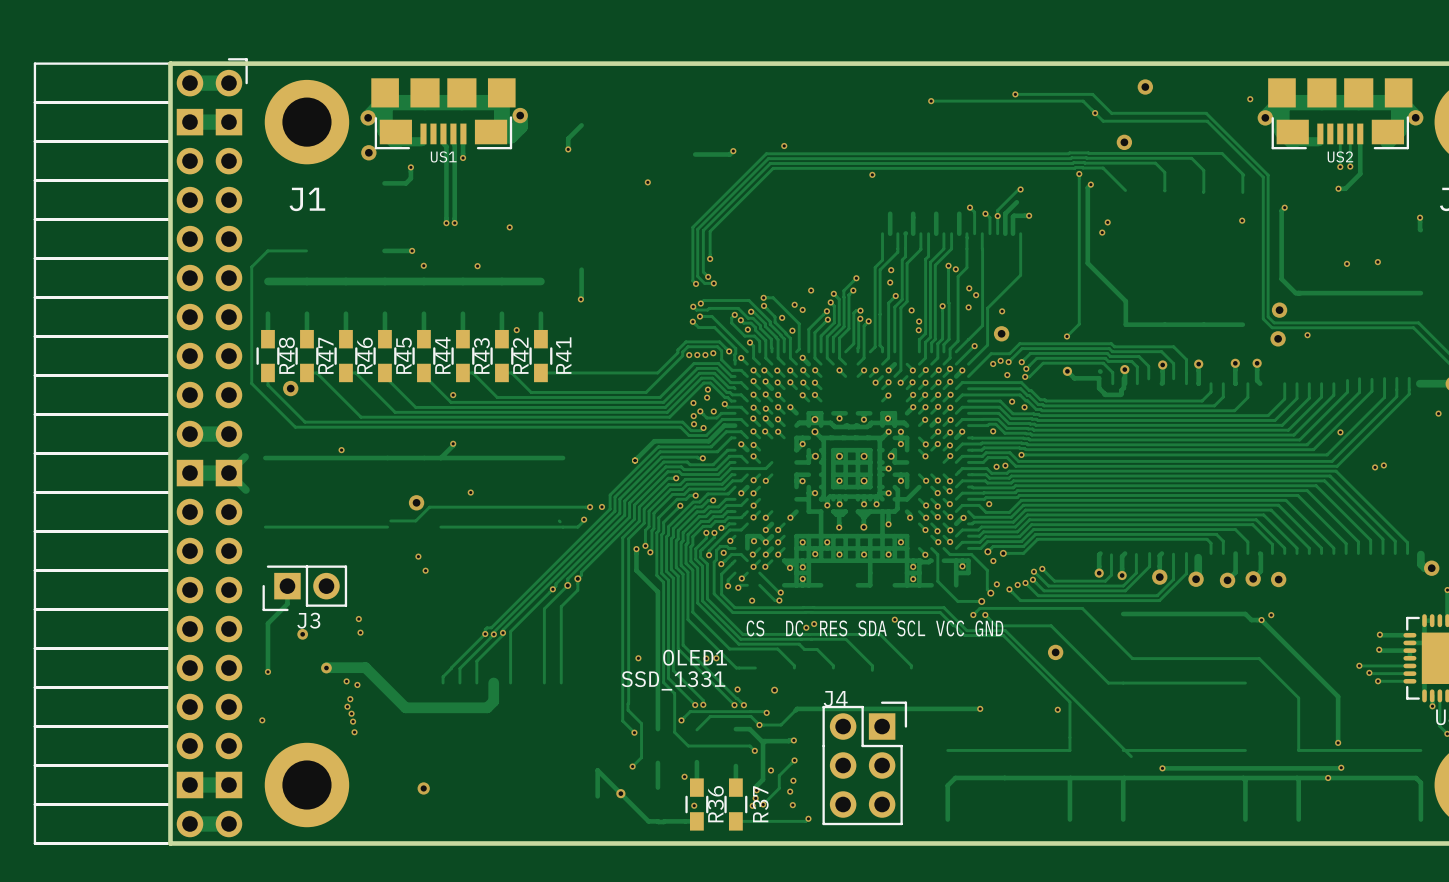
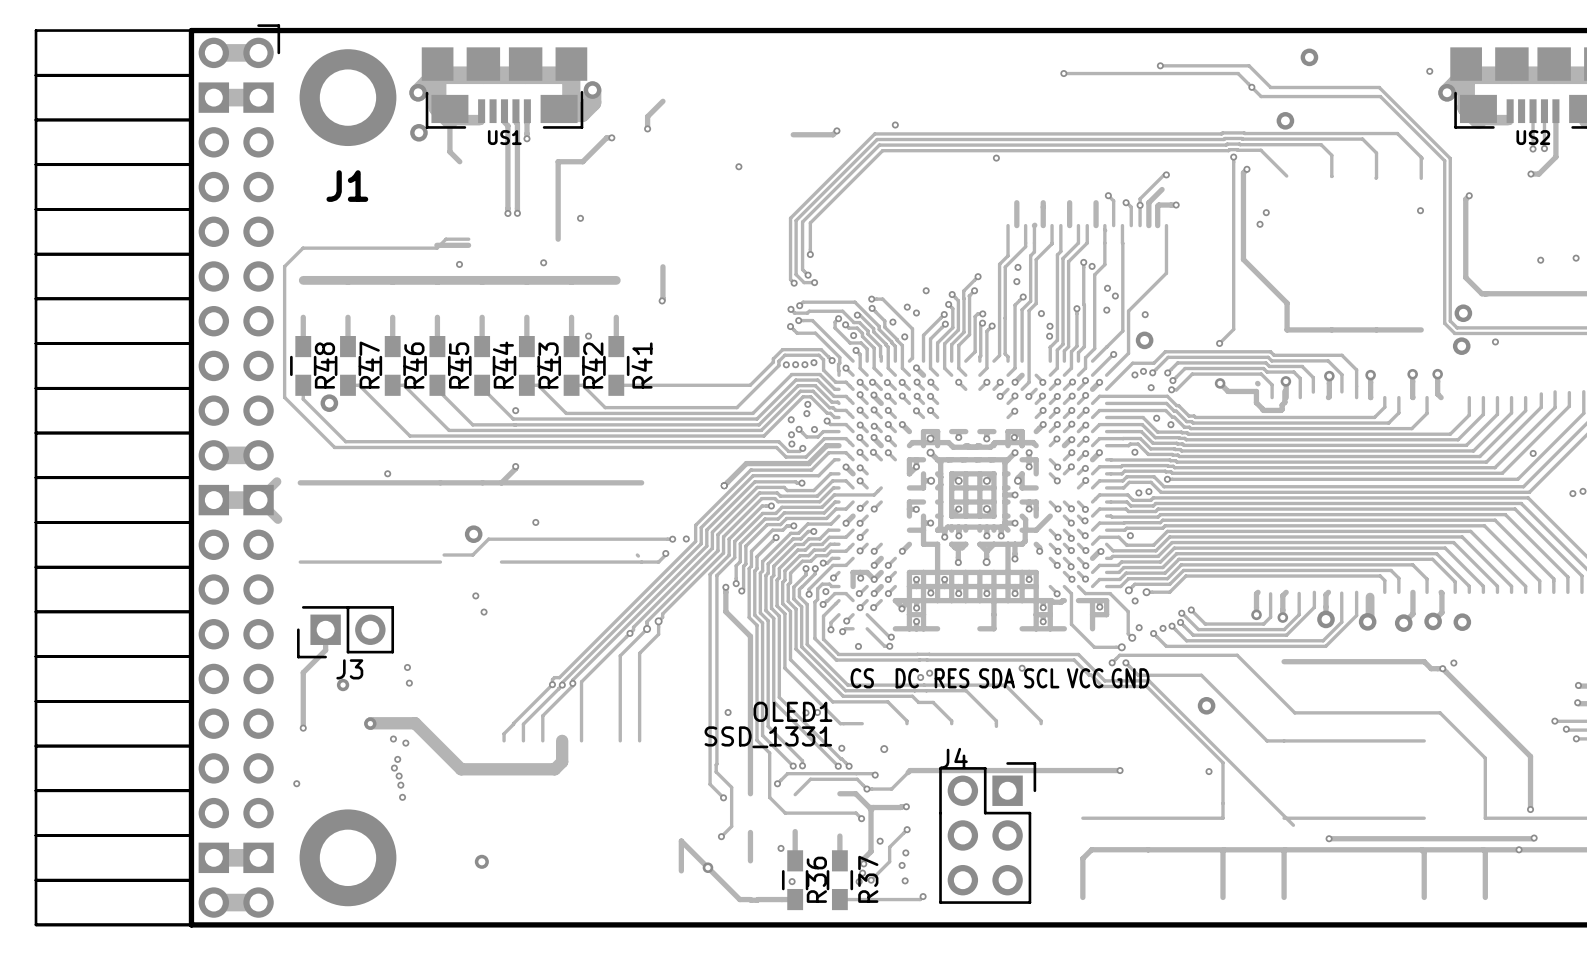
track: none -> (449, 108) (449, 151) (459, 161)
track: none -> (611, 137) (606, 137) (582, 161) (558, 161) (558, 239)
via: none -> (611, 137)
track: (410, 167) (410, 178) (405, 183) (384, 183) -> none
via: (410, 167) -> none
track: (306, 250) (267, 250) (251, 267) (251, 269) -> (468, 239) (446, 239) (437, 248) (303, 248) (284, 266)
via: (412, 250) -> none
via: (423, 265) -> none
via: none -> (459, 264)

